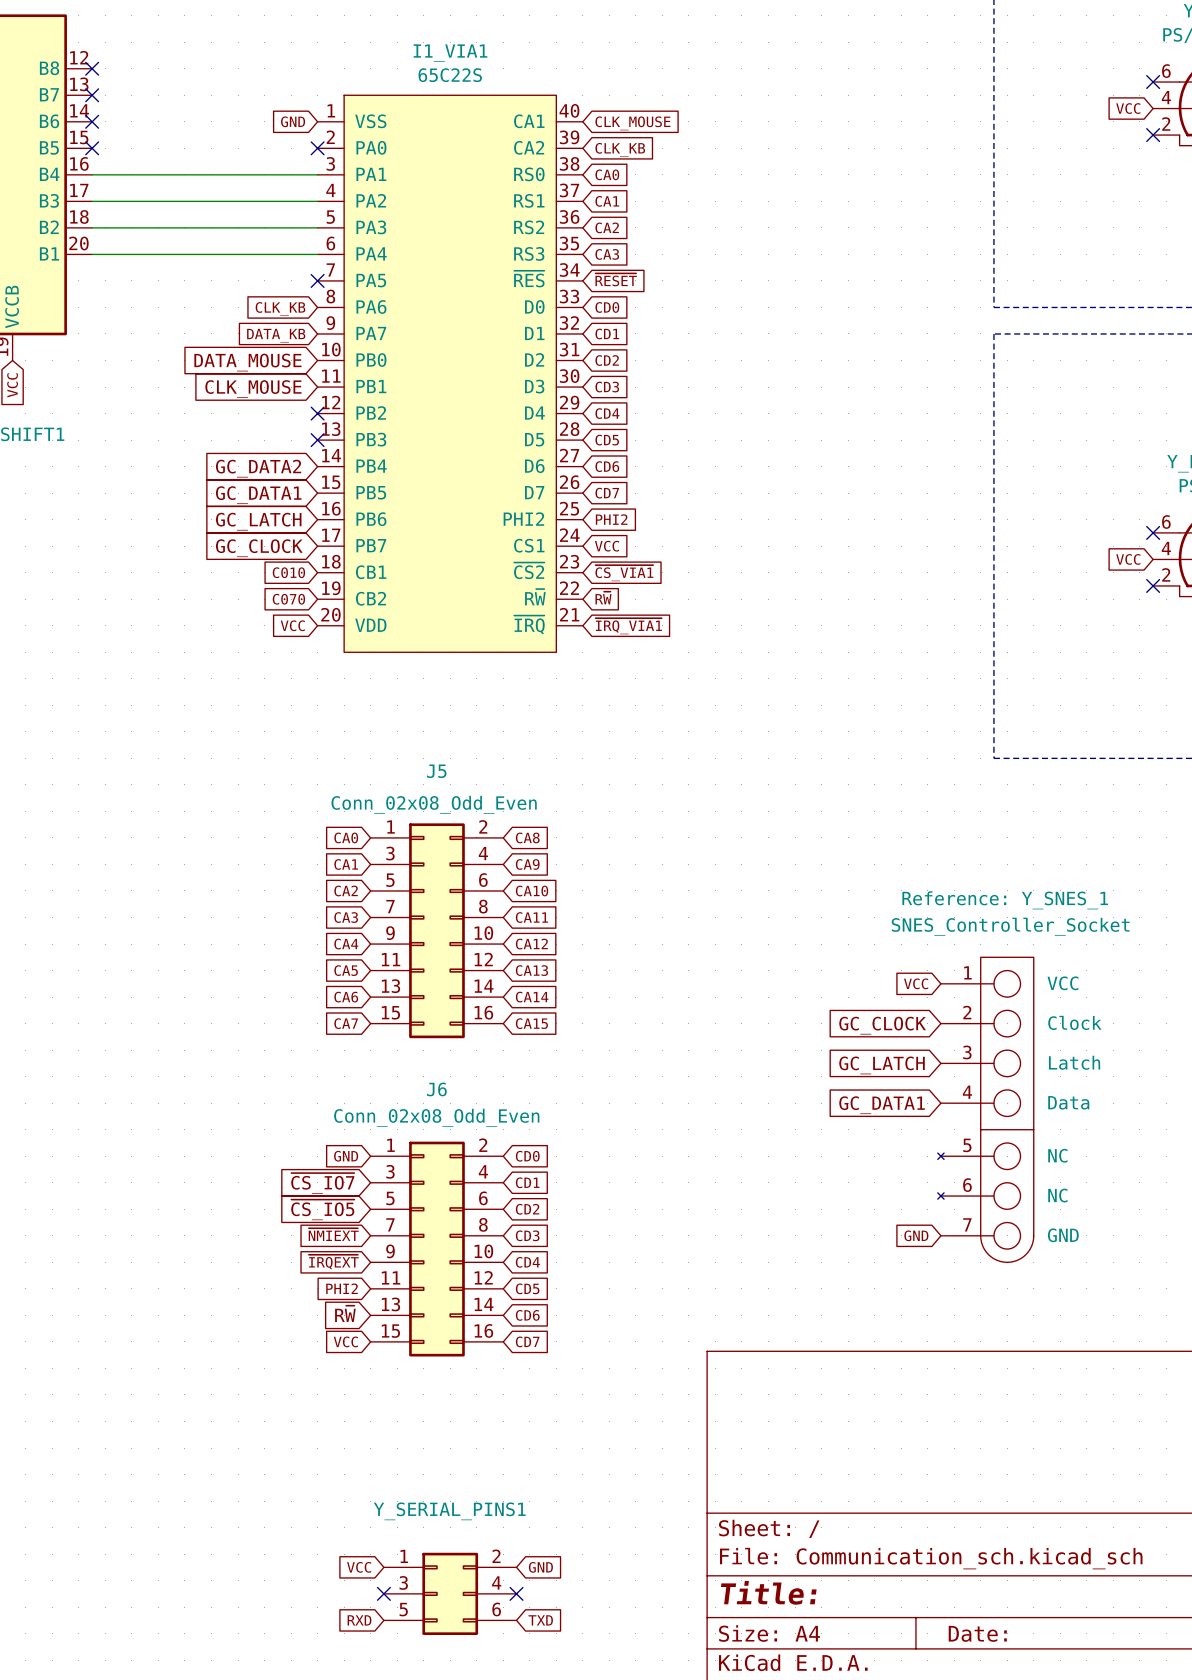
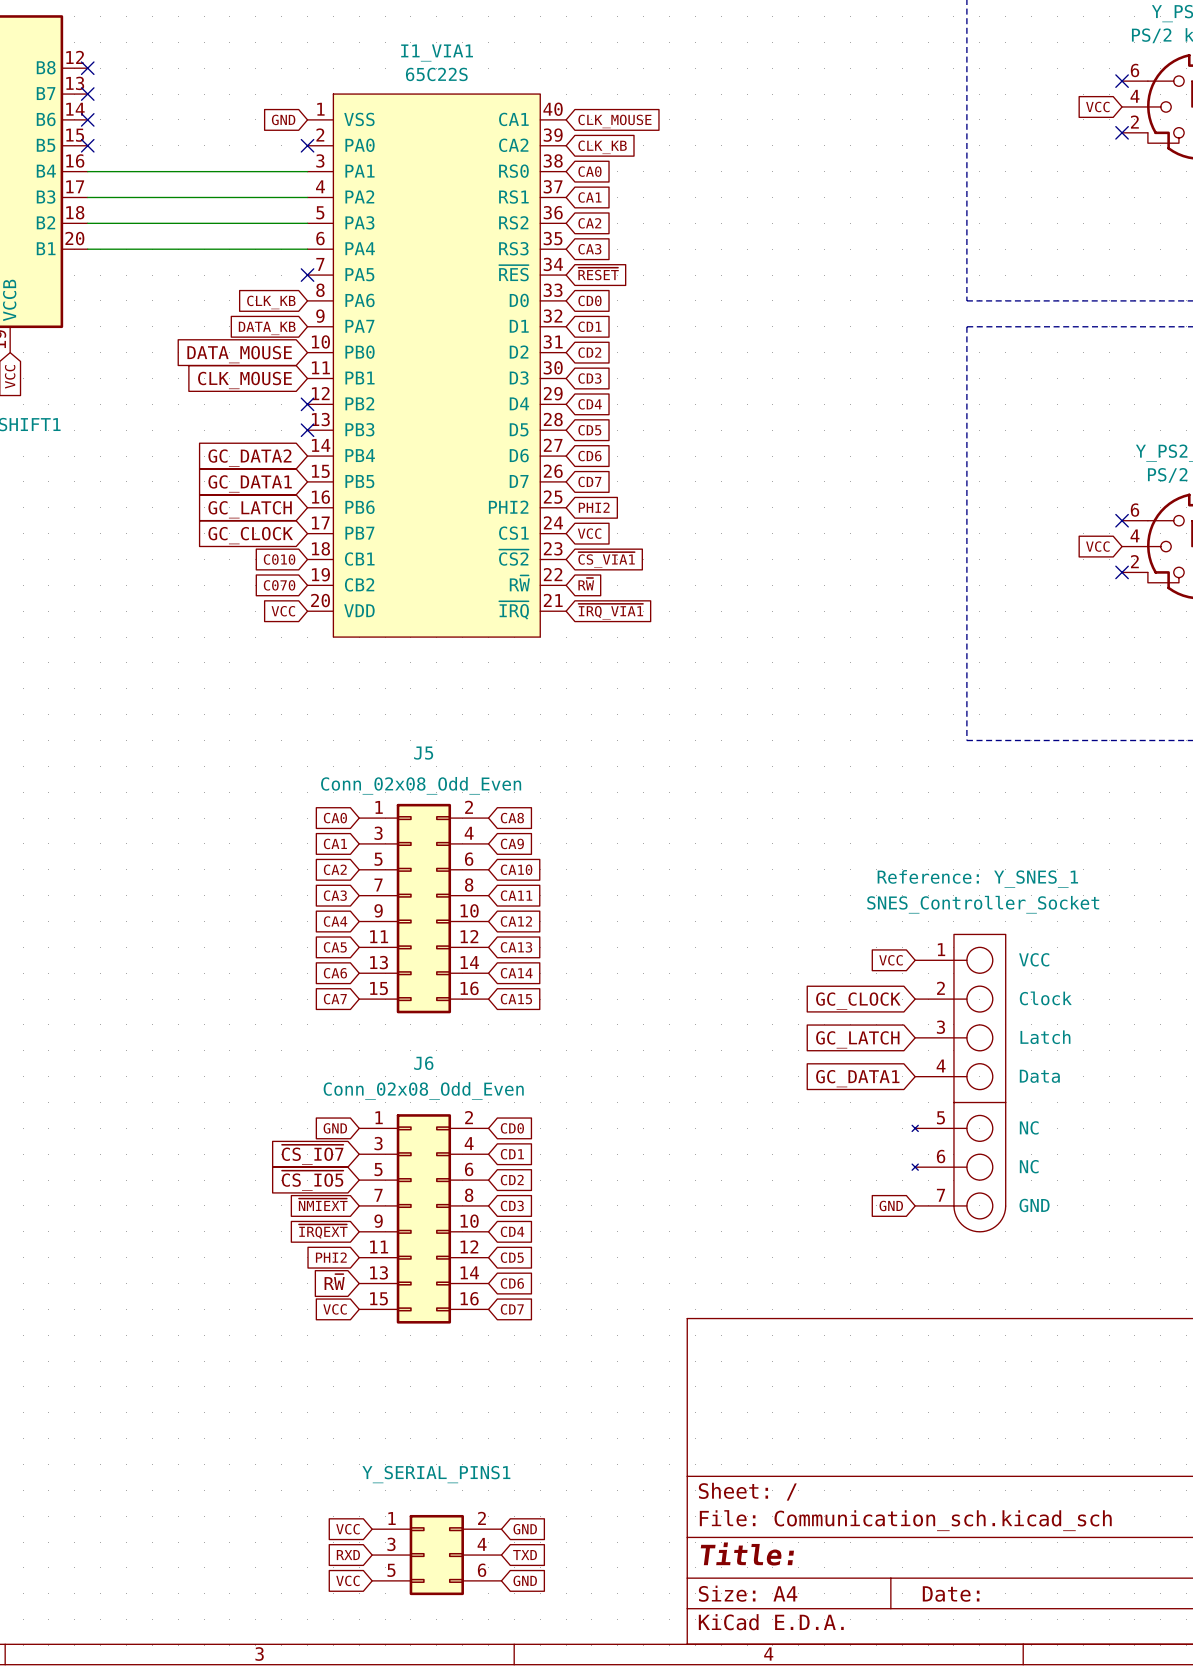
global label: none -> RXD (348, 1555)
no-connect mark: (383, 1593) -> none
no-connect mark: (516, 1593) -> none
global label: none -> TXD (525, 1555)
global label: RXD (359, 1620) -> VCC (347, 1580)
global label: TXD (540, 1620) -> GND (525, 1580)

